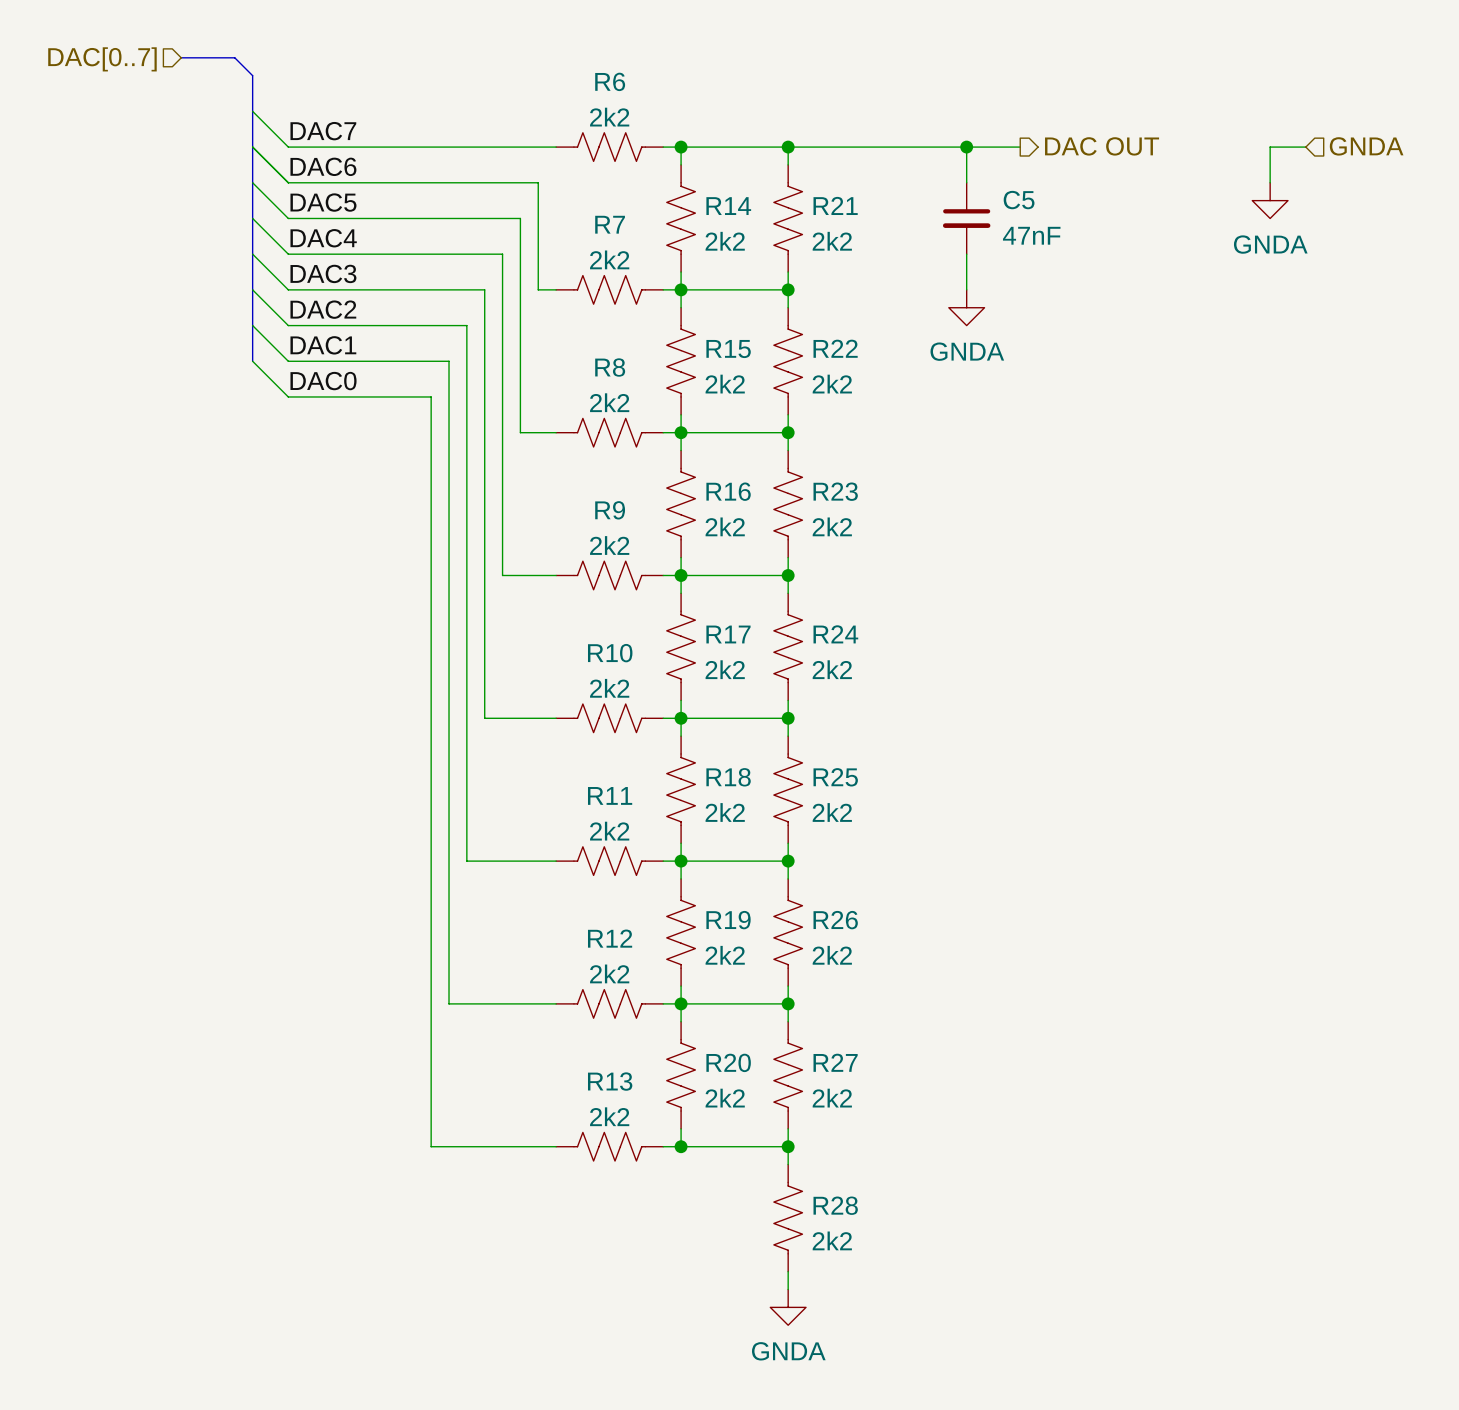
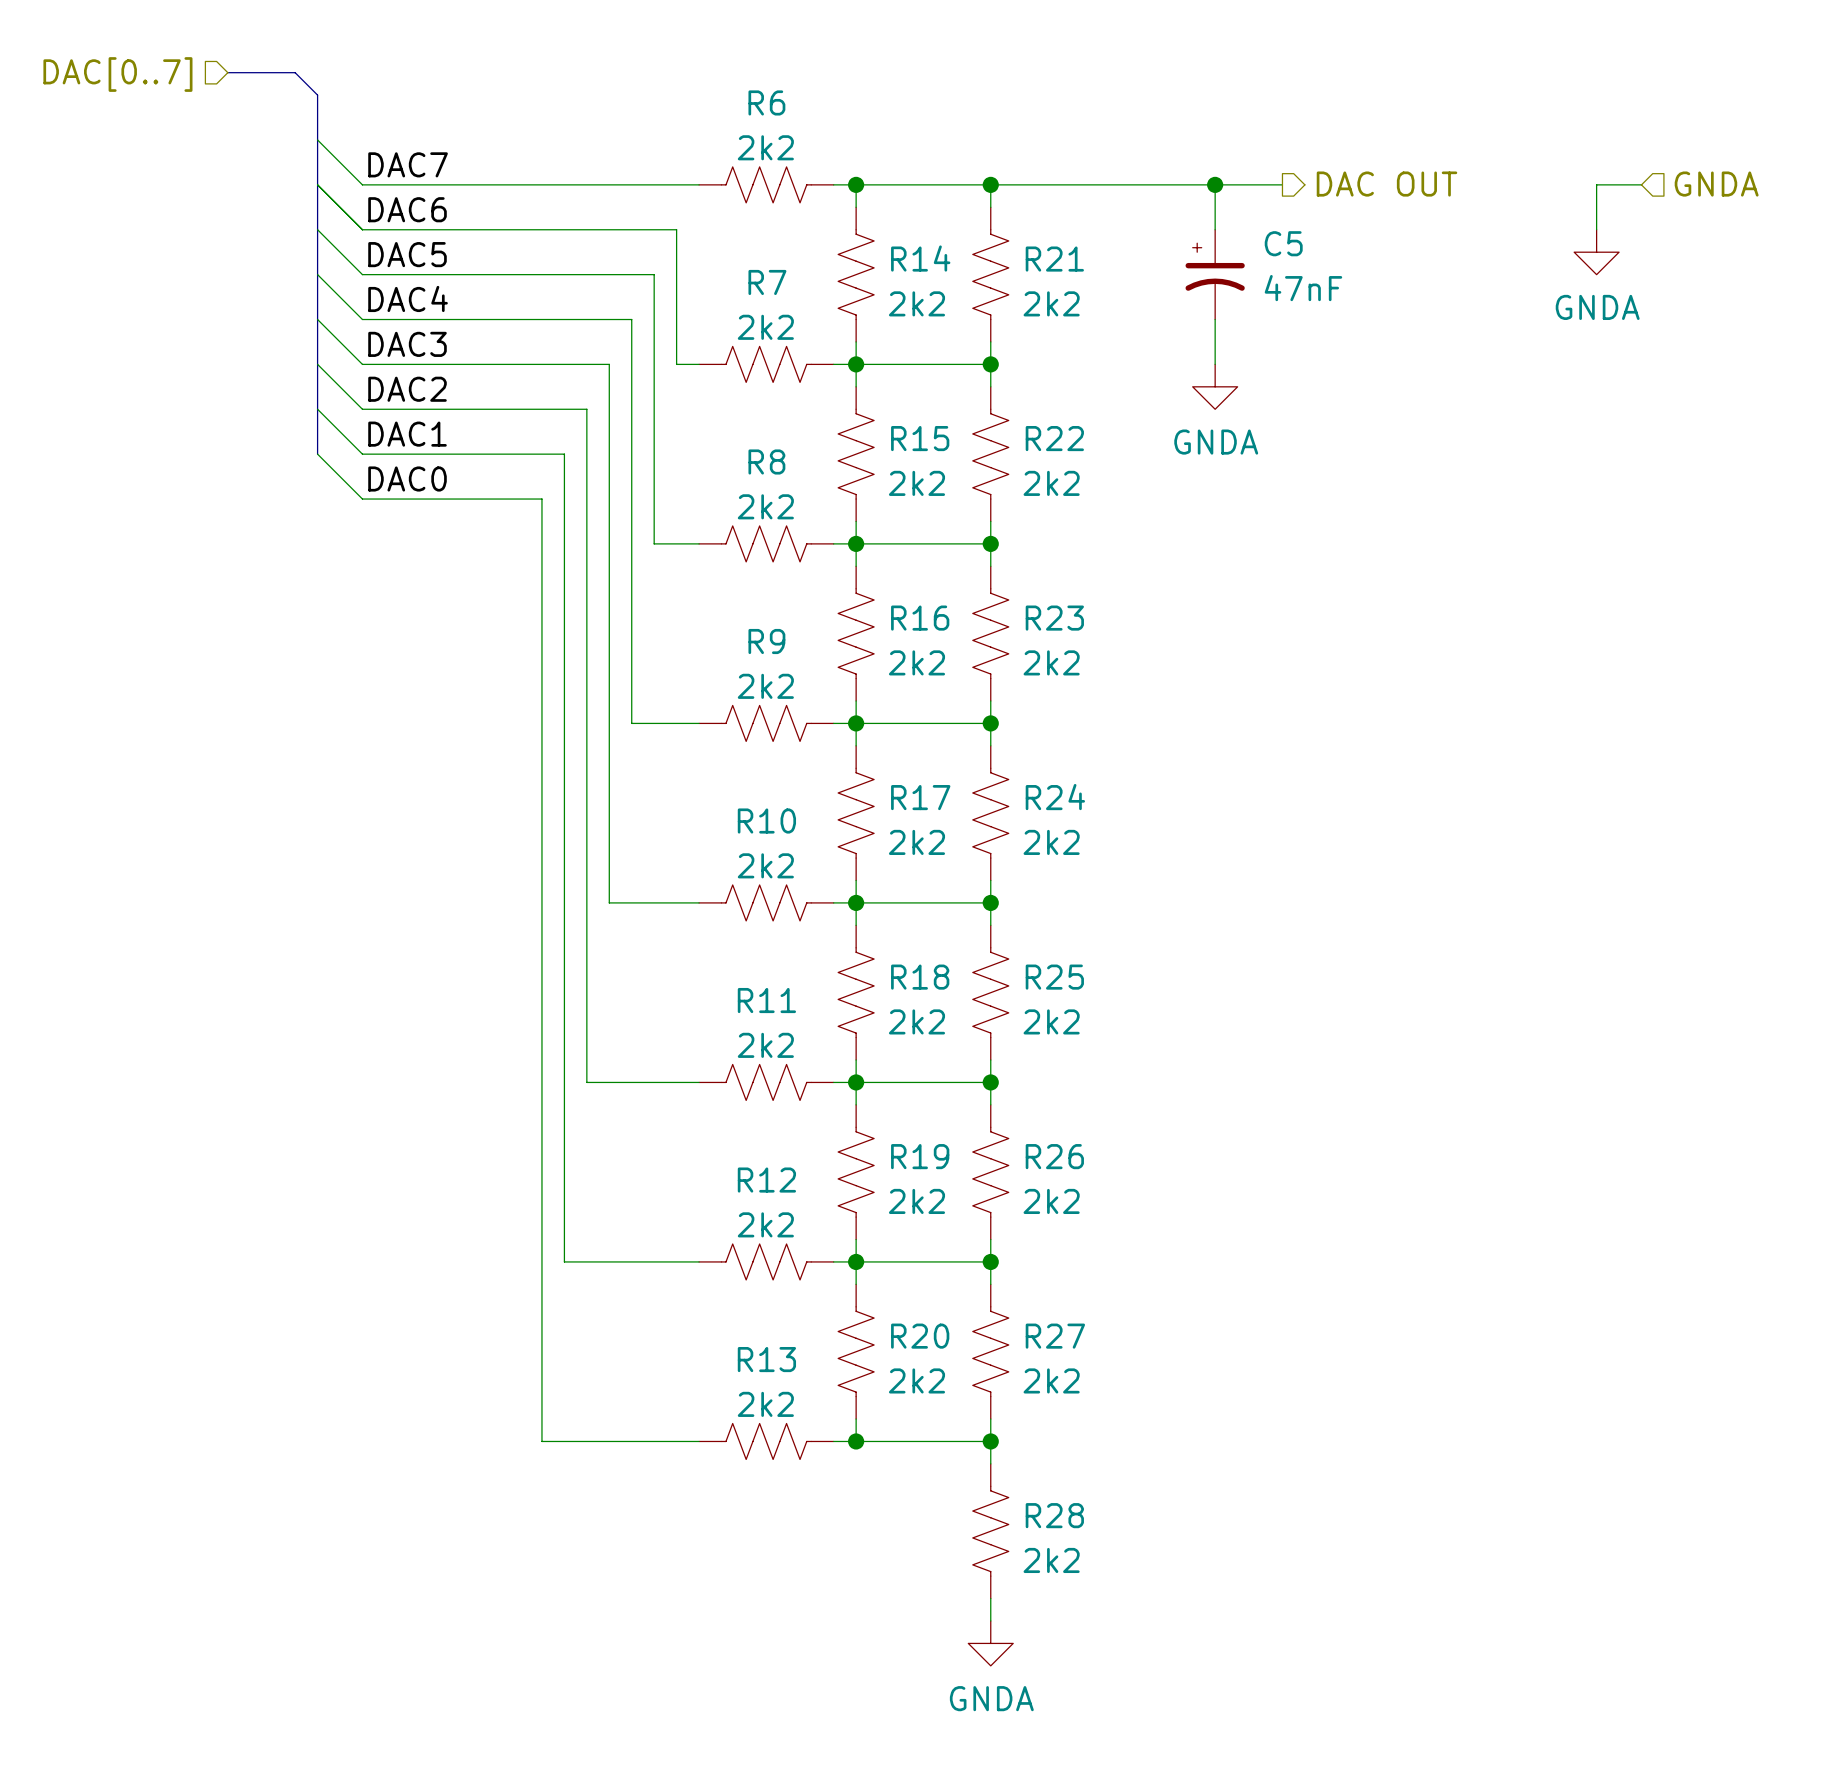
C5 symbol: [942, 182, 991, 255] -> [1185, 229, 1245, 320]

